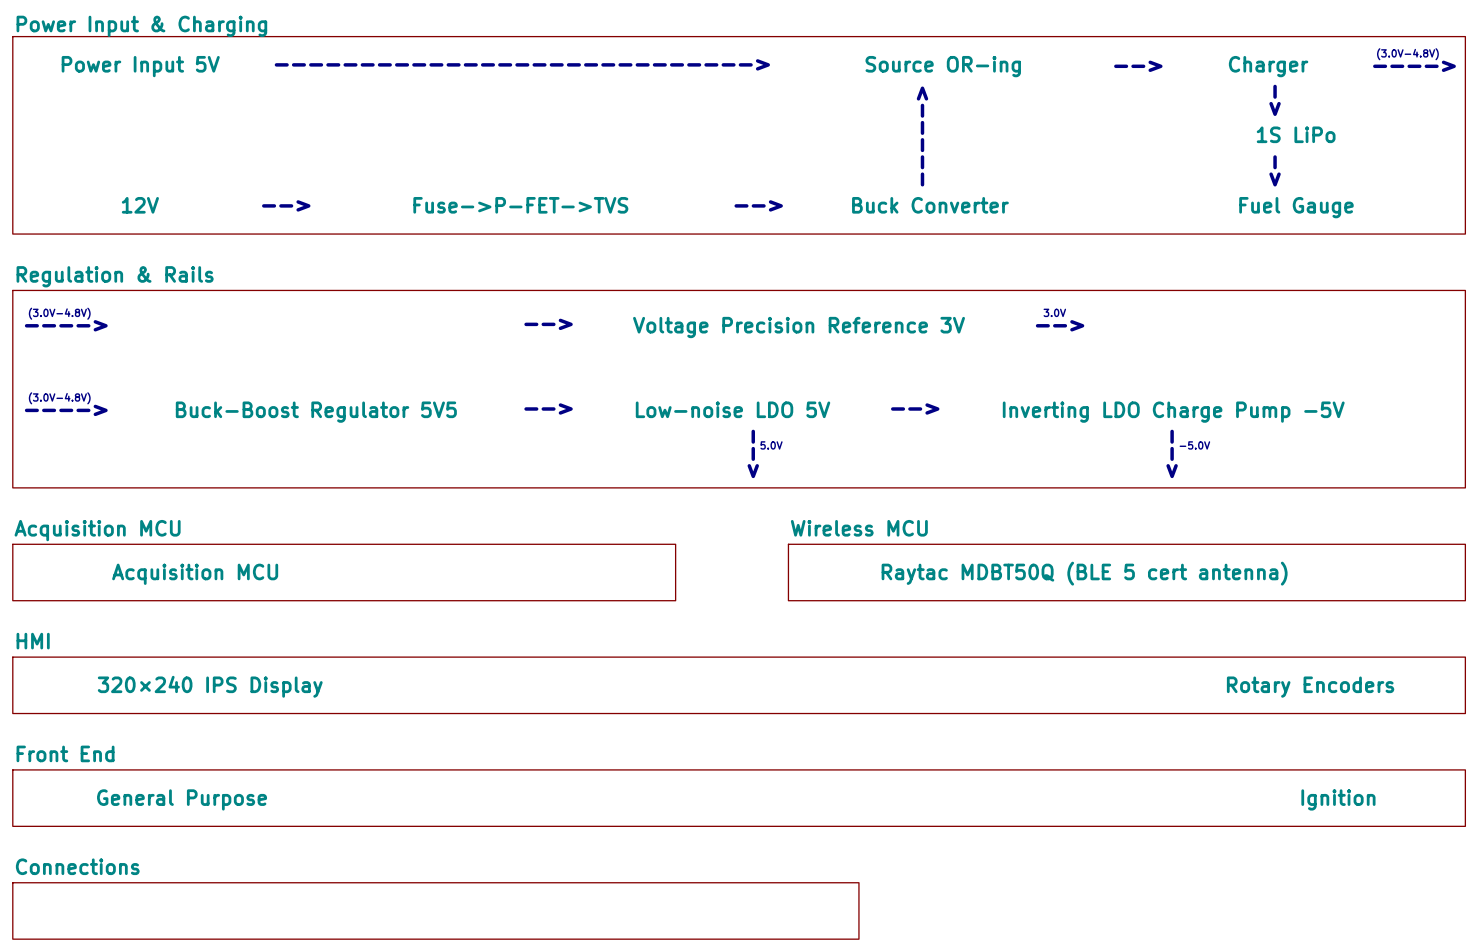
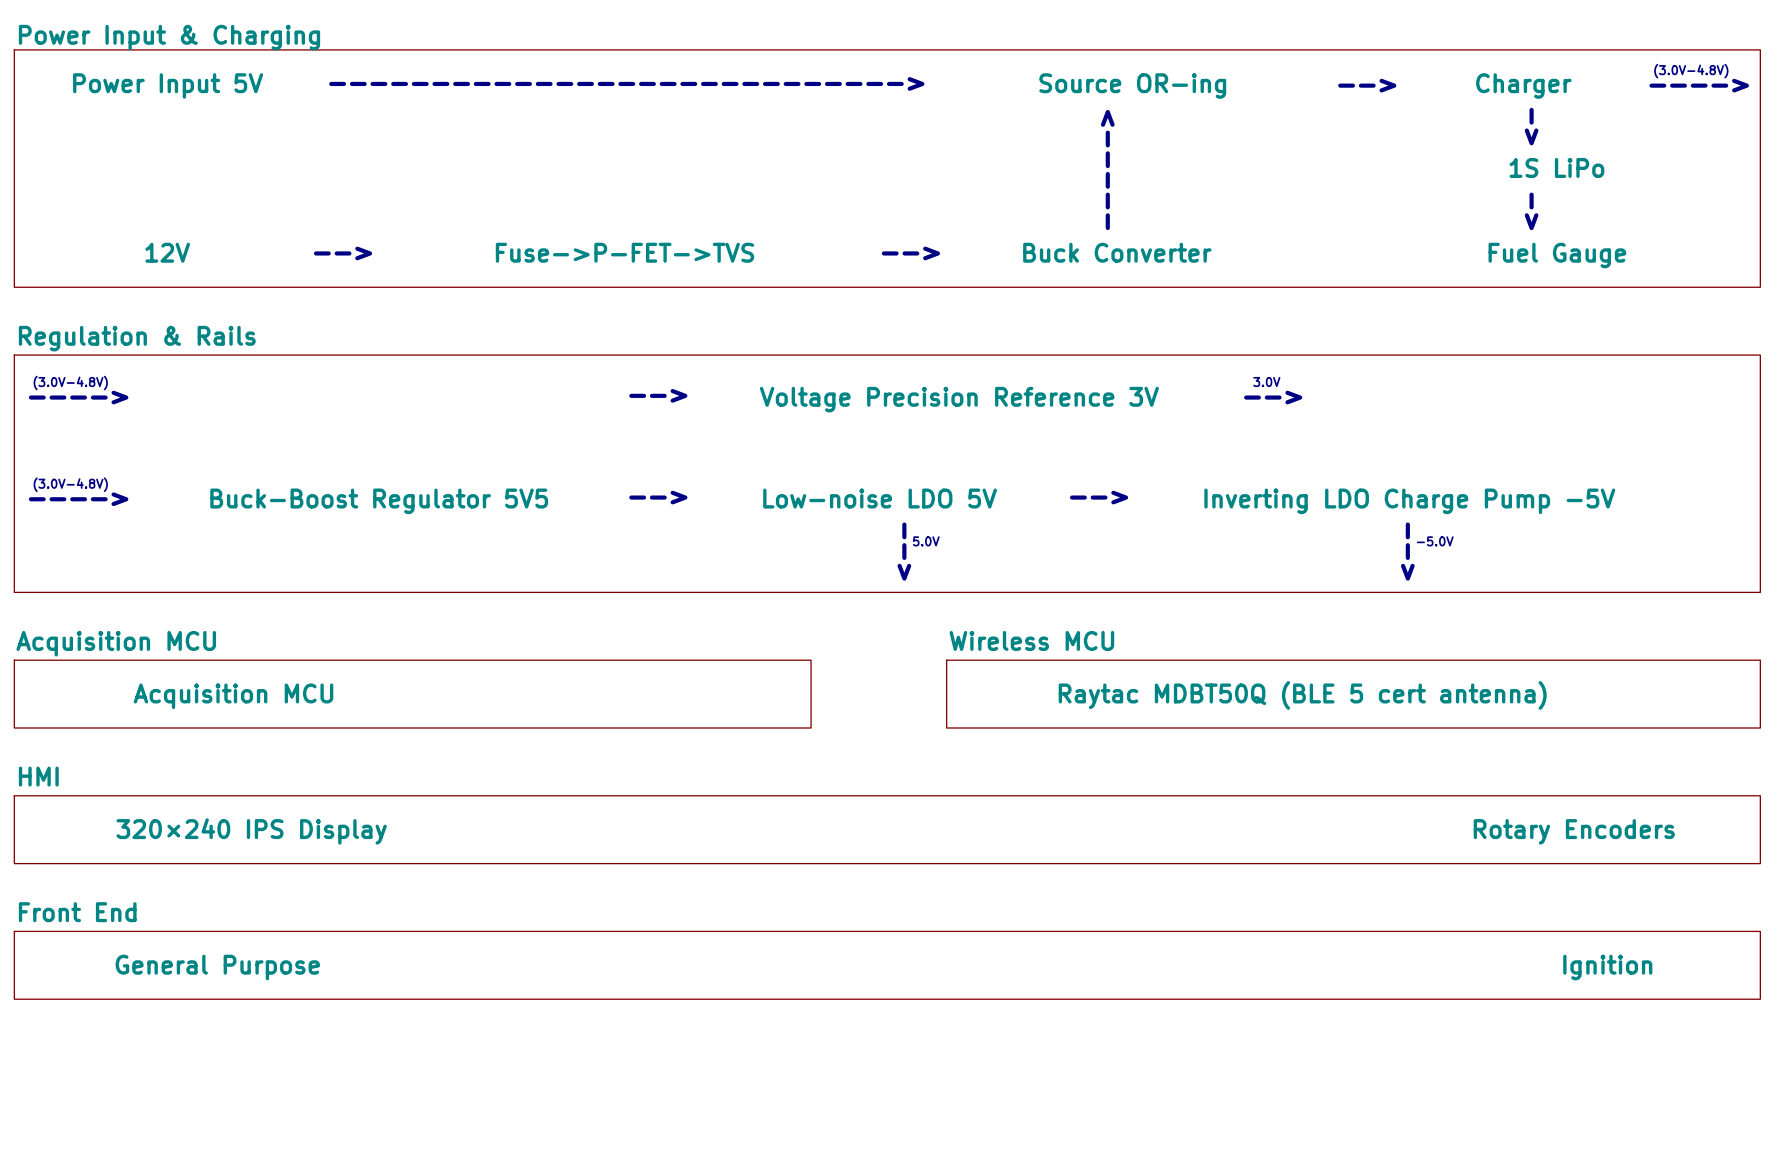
sheet Connections: (435, 910) -> none

